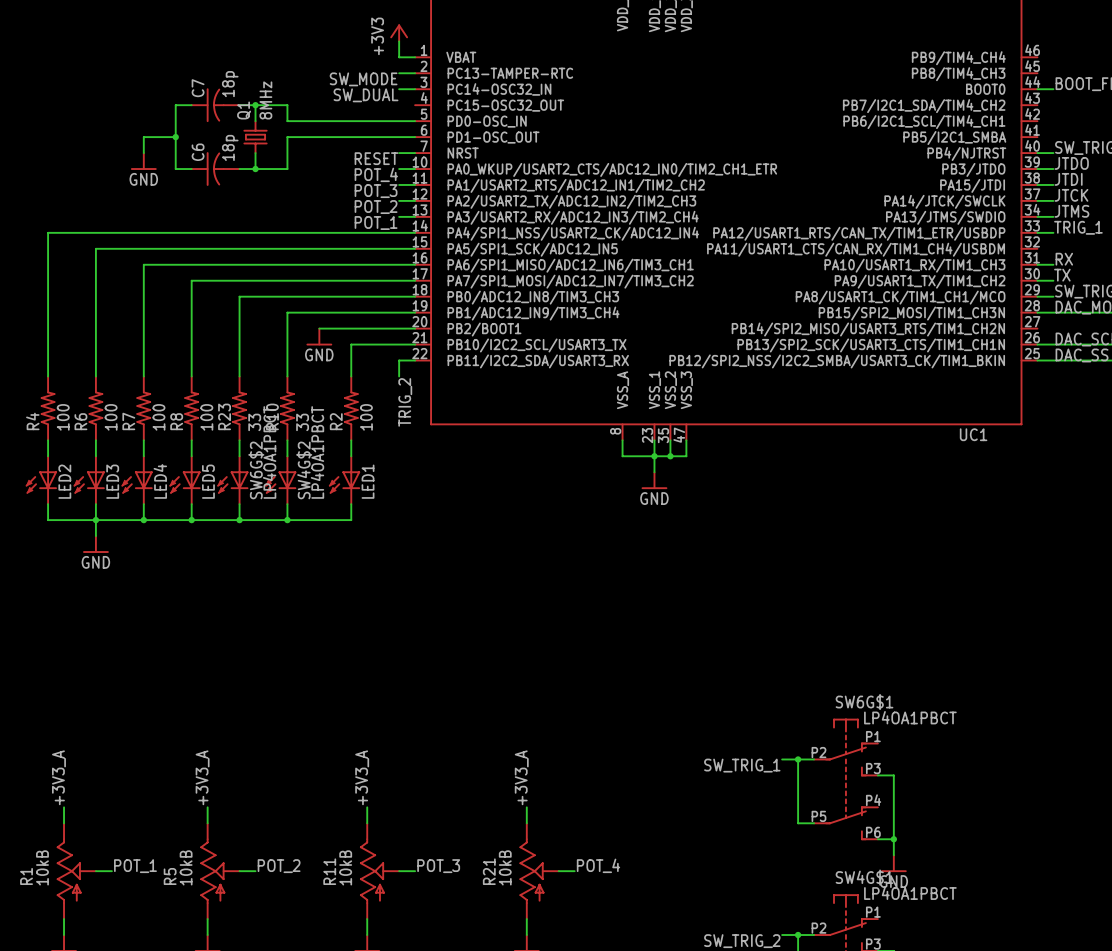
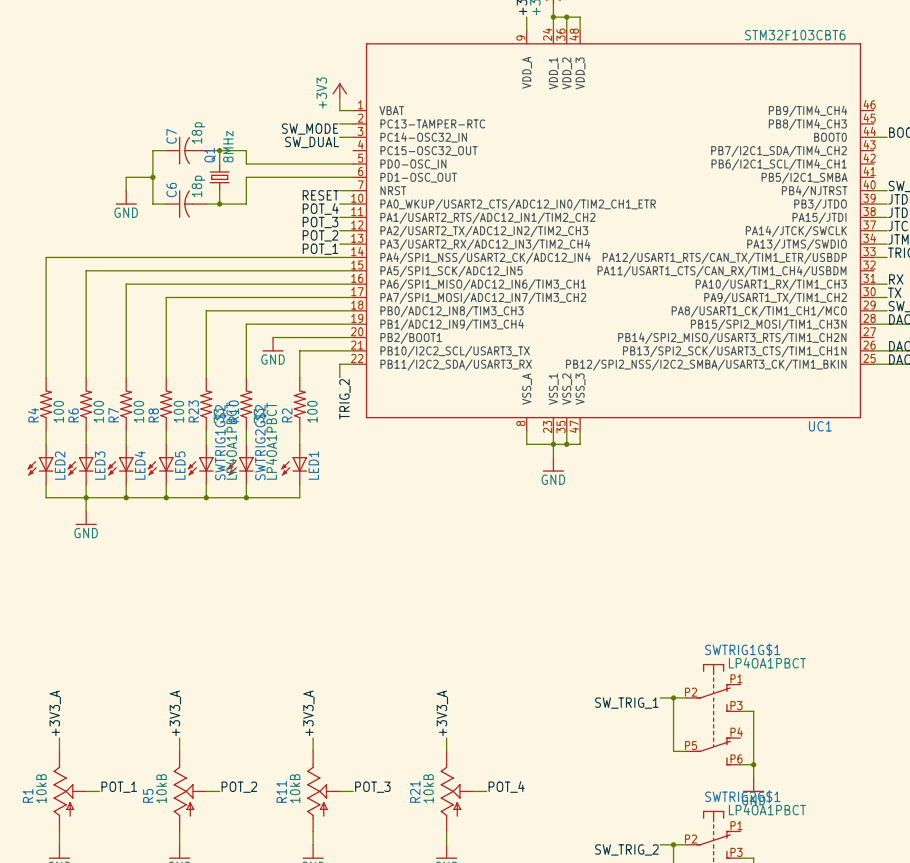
SW6G$2 name: SW6G$2 (256, 470) -> SWTRIG1G$2 (220, 442)
SW4G$2 name: SW4G$2 (304, 470) -> SWTRIG2G$2 (260, 442)
SW6G$1 name: SW6G$1 (864, 702) -> SWTRIG1G$1 (742, 649)
SW4G$1 name: SW4G$1 (864, 877) -> SWTRIG2G$1 (742, 796)

